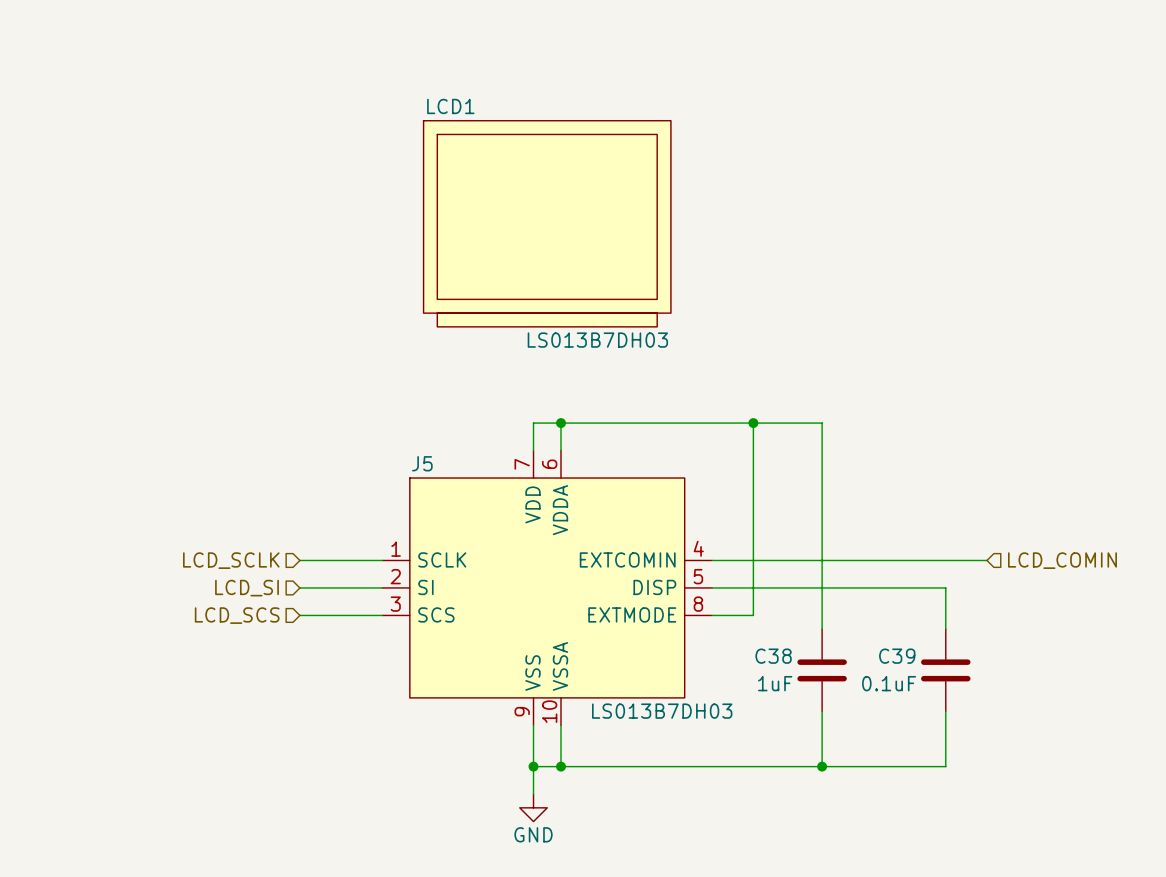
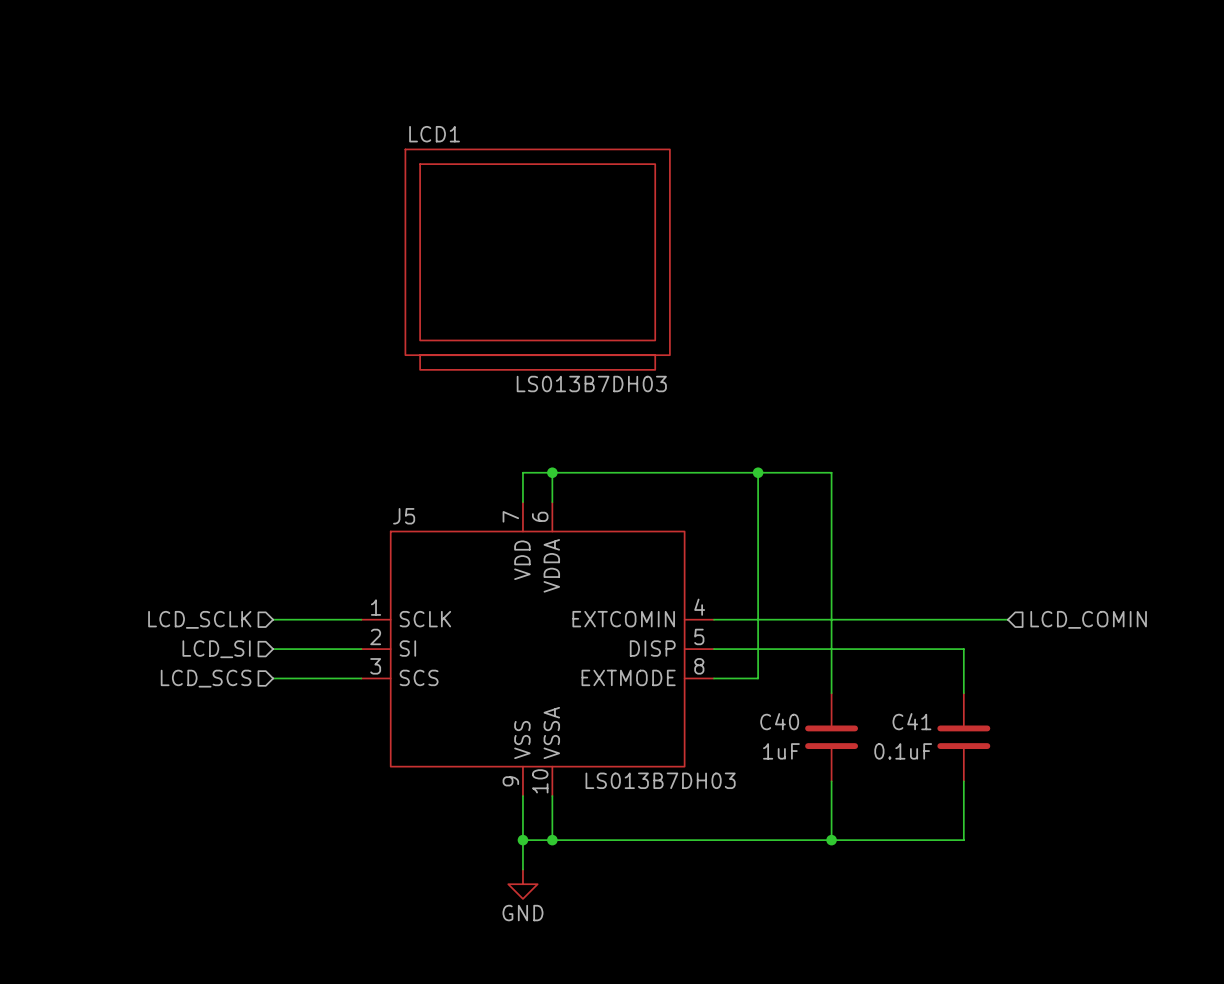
C38 name: C38 (773, 656) -> C40 (779, 721)
C39 name: C39 (897, 656) -> C41 (911, 721)

